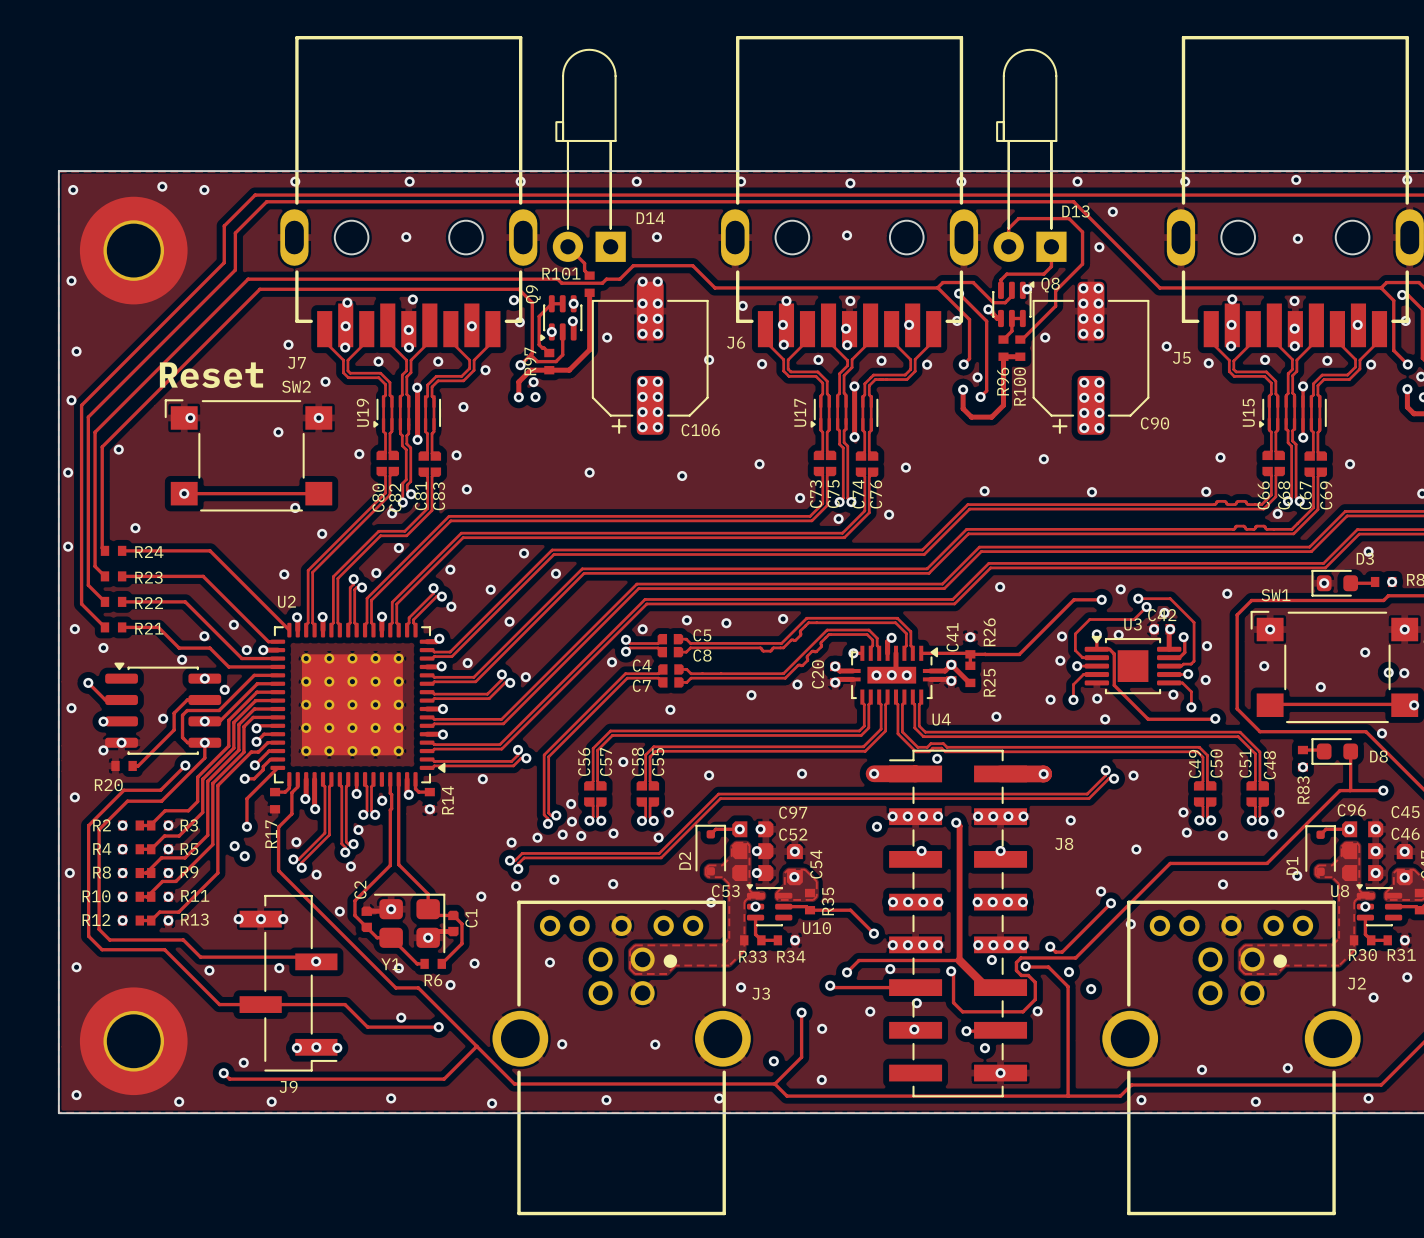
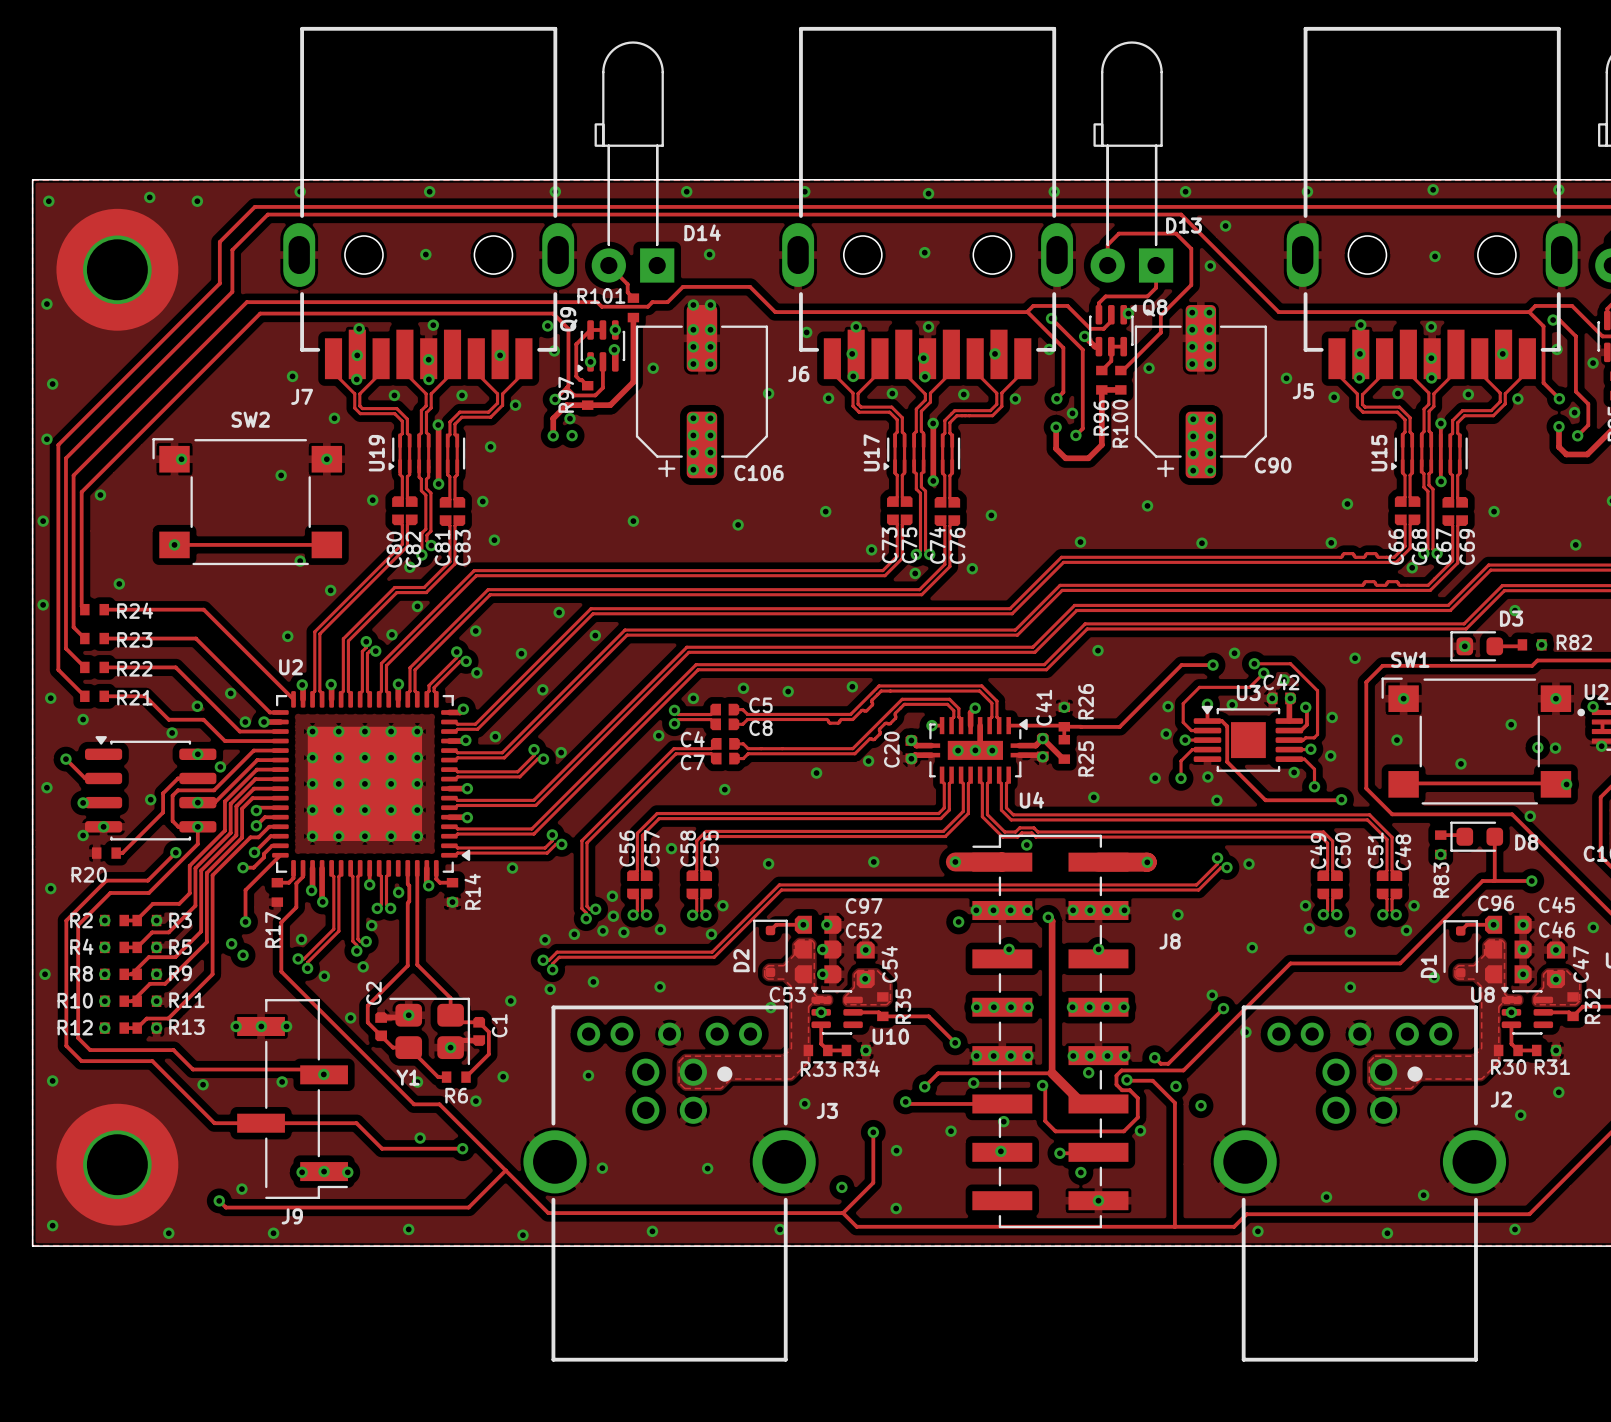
text: Reset (211, 375) -> none
SW2 name position: SW2 (296, 386) -> SW2 (250, 419)

